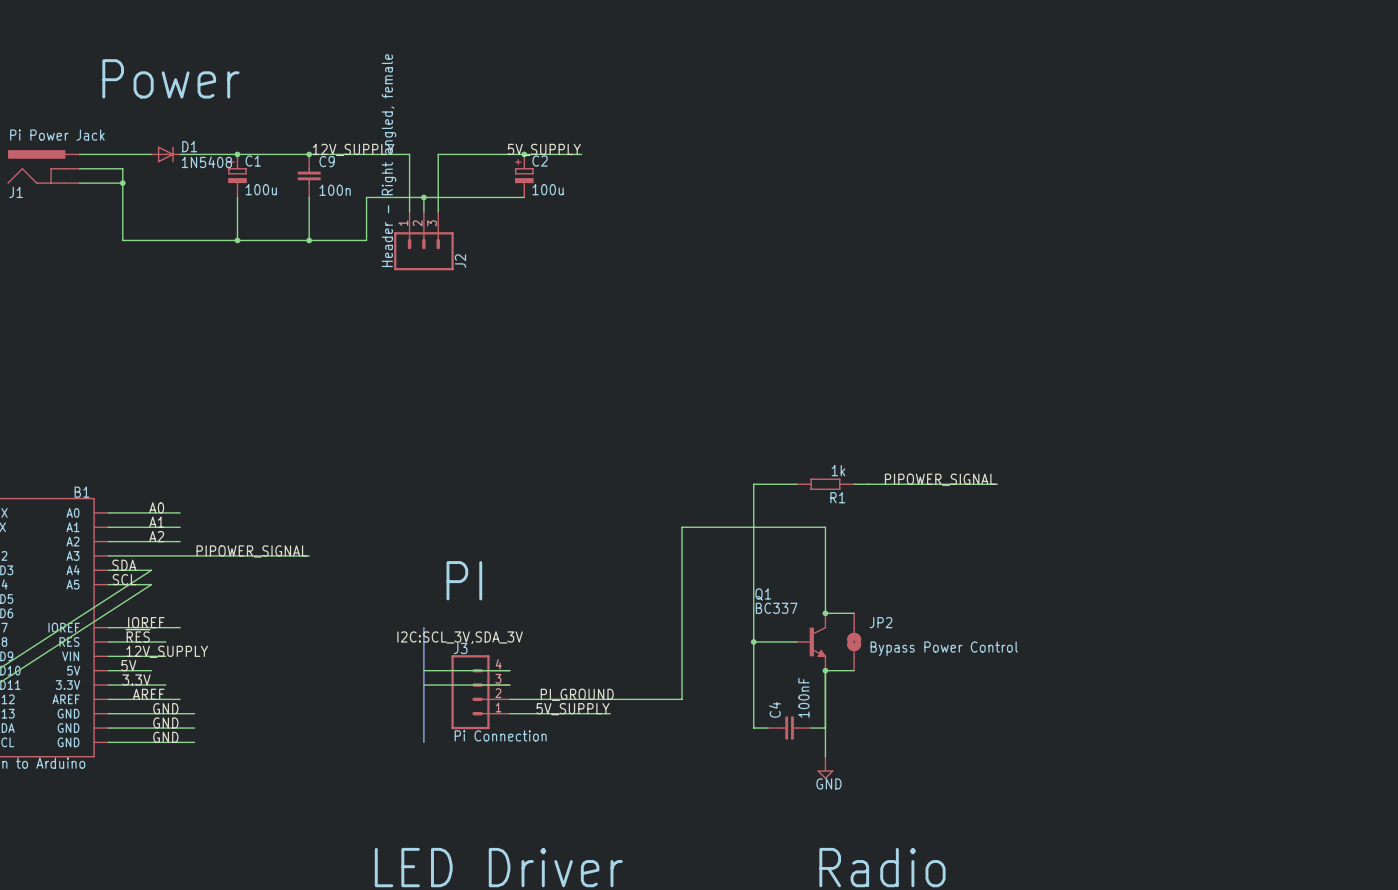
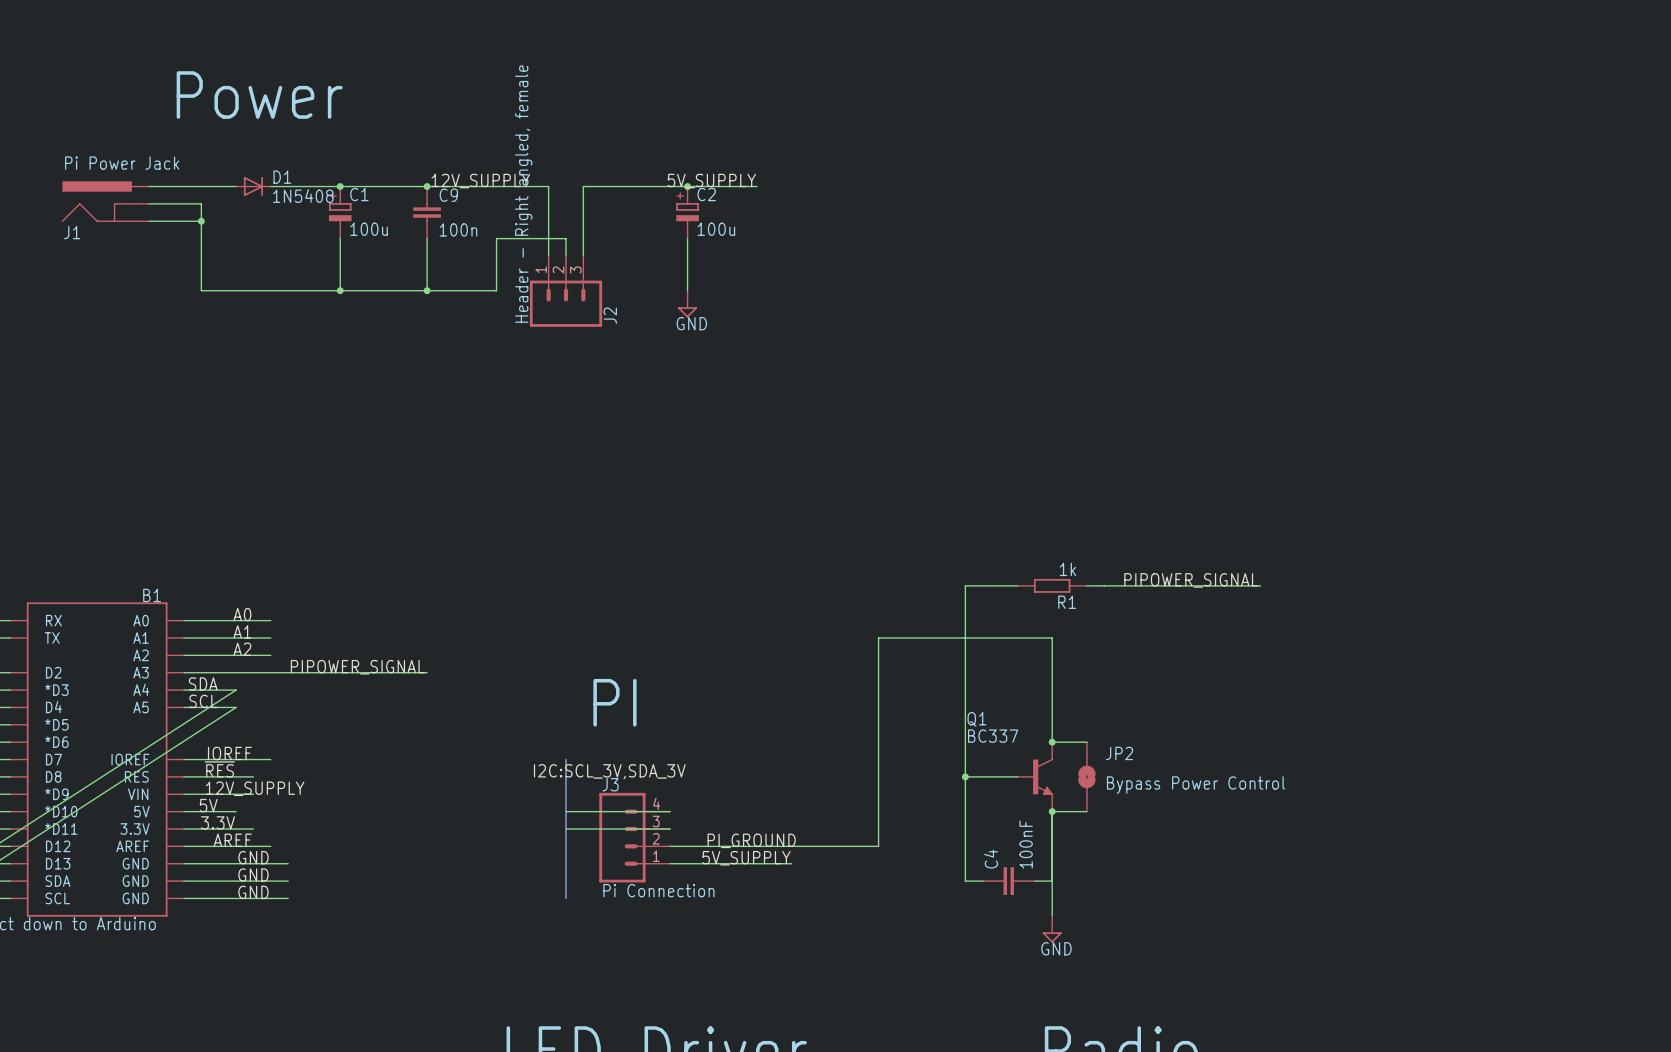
wire: (423, 197) (524, 197) -> (687, 290) (687, 238)
junction: (423, 197) -> none
power symbol: none -> GND (687, 304)

